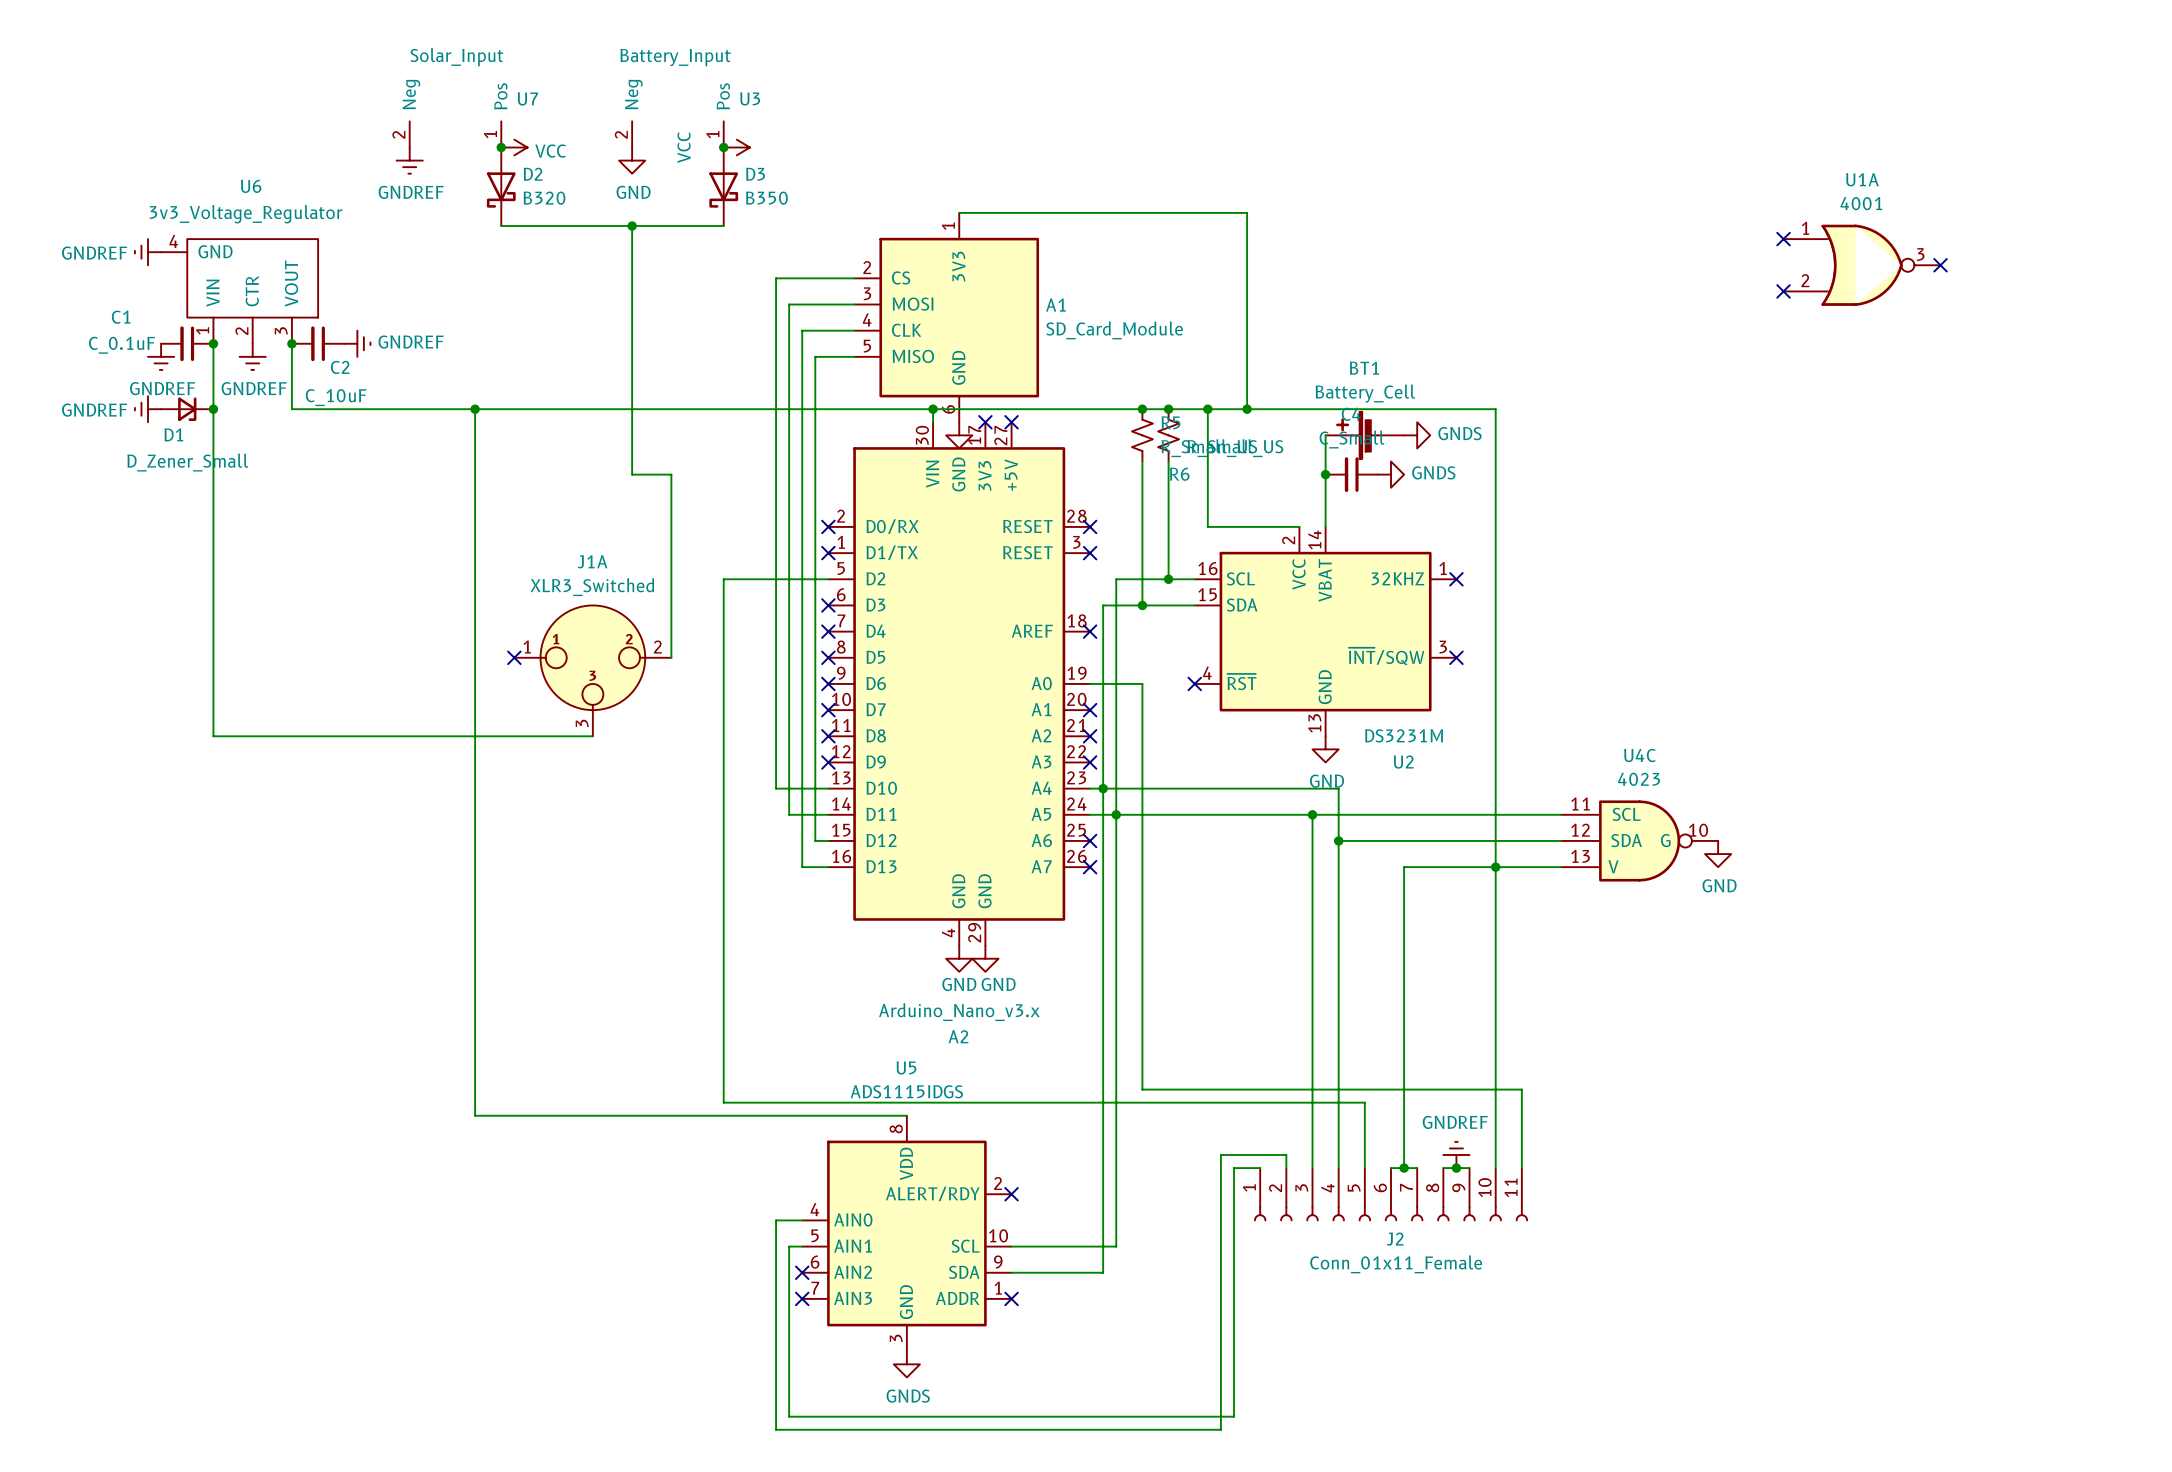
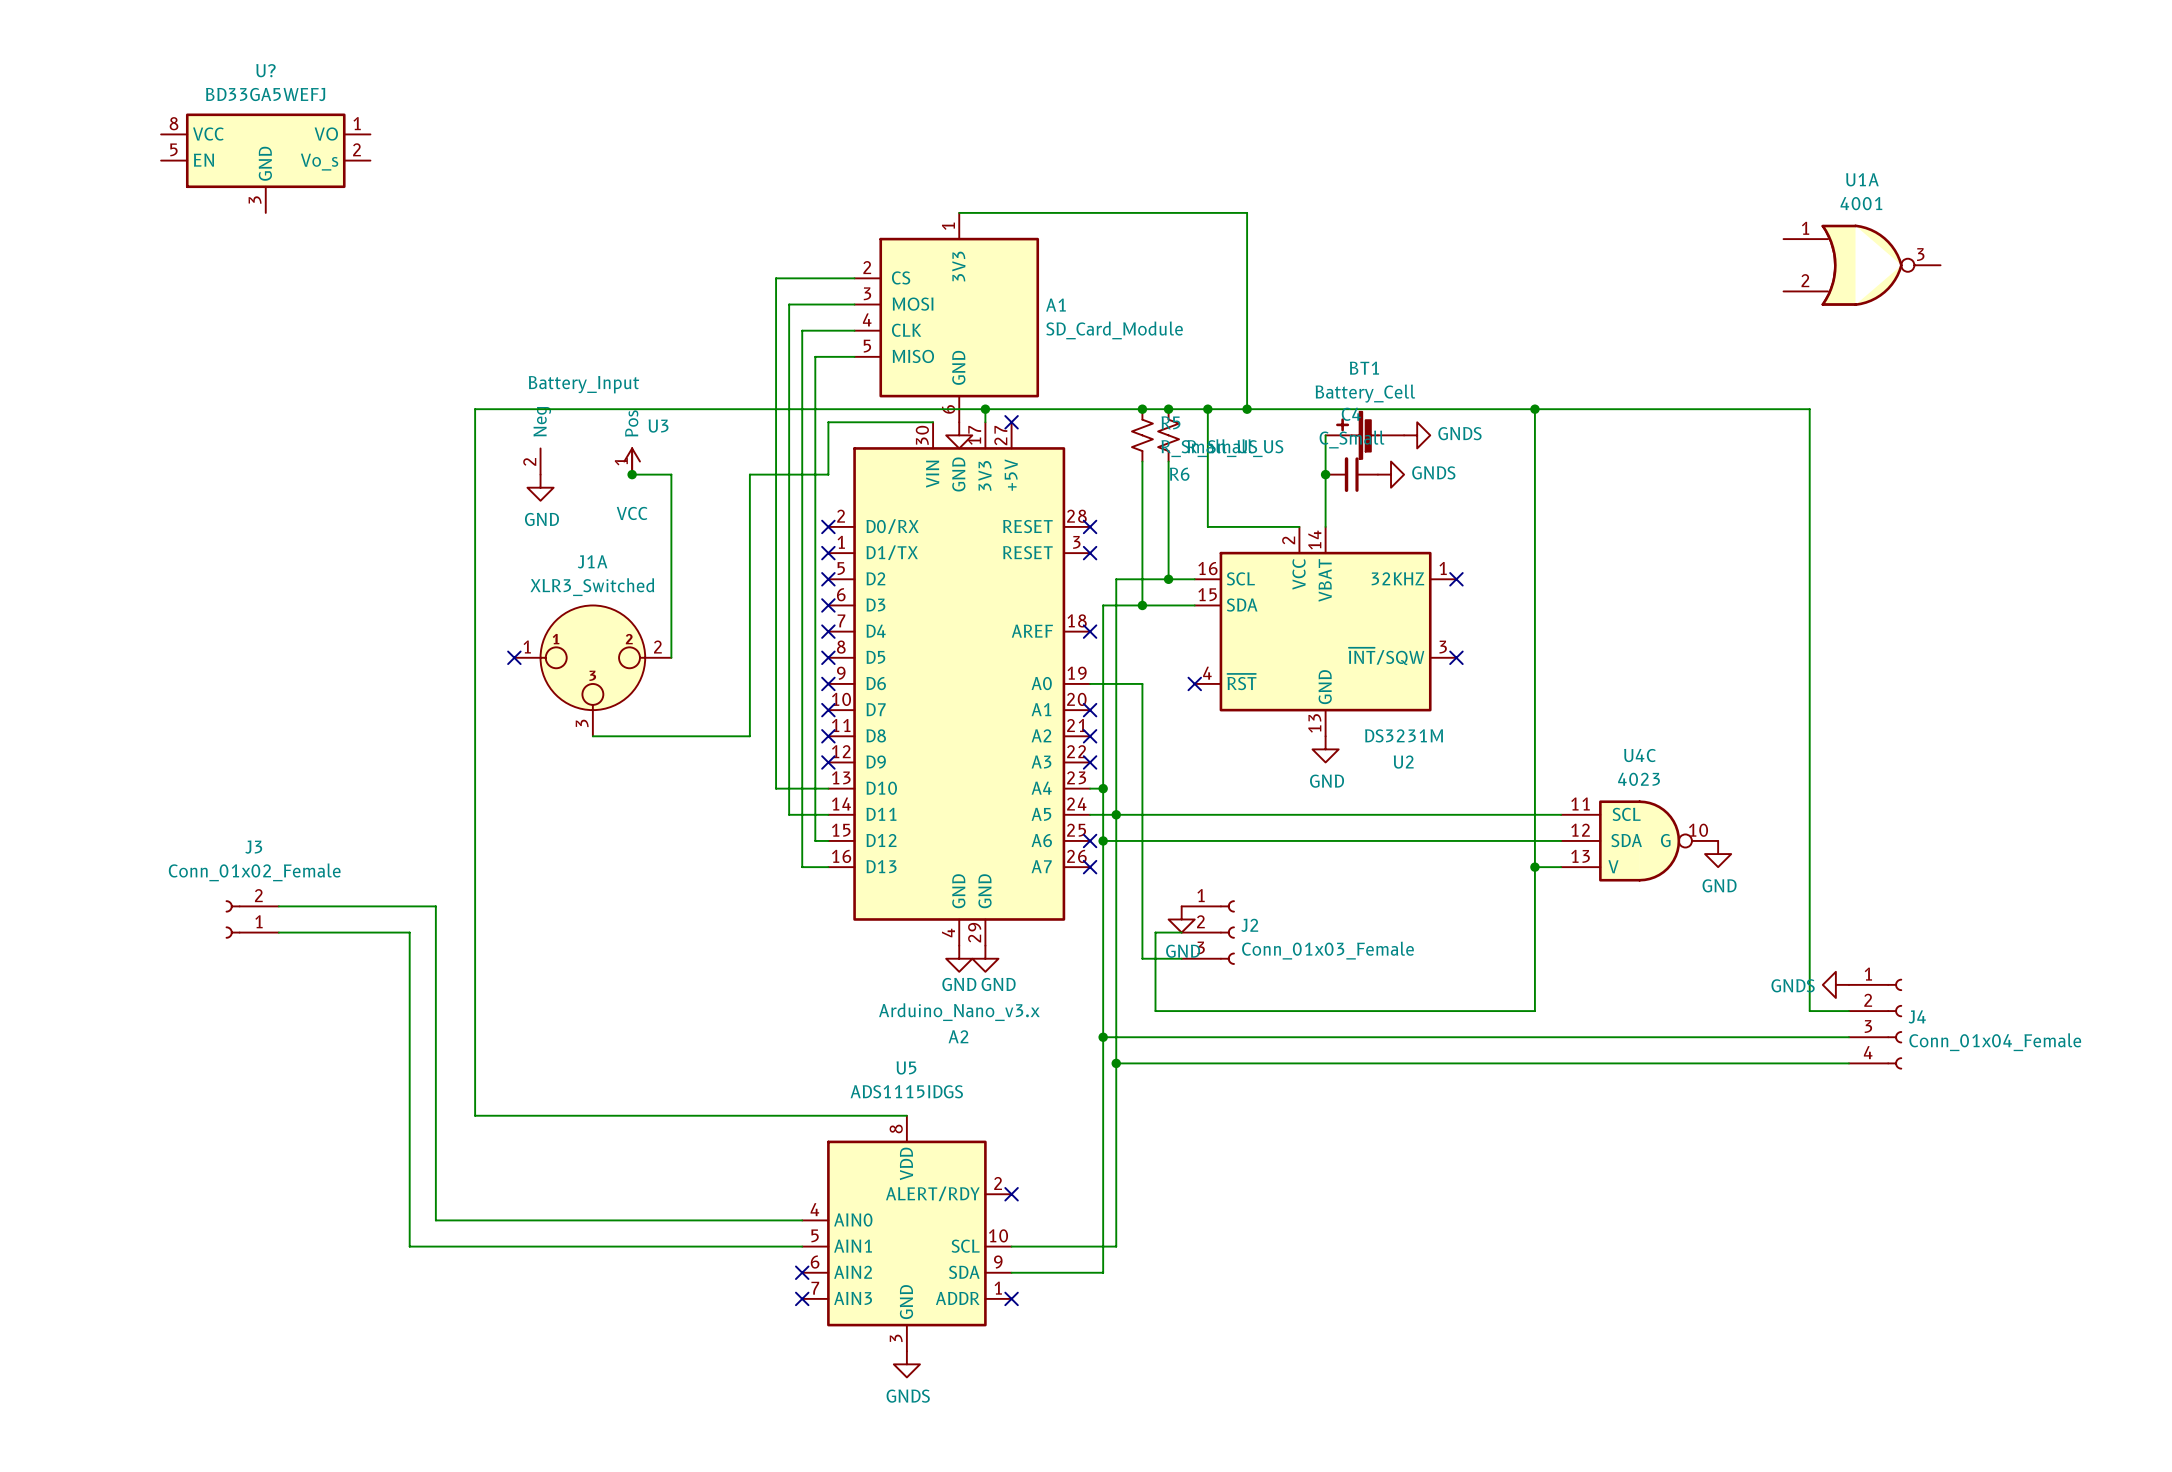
U7: Solar_Input (455, 134) -> none
U3 position: (677, 134) -> (586, 461)
junction: (501, 147) -> none
power symbol: VCC (514, 147) -> none
junction: (723, 147) -> none
power symbol: VCC (736, 147) -> none
power symbol: GNDREF (409, 160) -> none
power symbol: GND (632, 160) -> none
U?: none -> BD33GA5WEFJ (265, 163)
D2: B320 (501, 186) -> none
D3: B350 (723, 186) -> none
wire: (501, 226) (723, 226) -> none
wire: (632, 226) (632, 474) -> none
junction: (632, 226) -> none
no-connect mark: (1783, 239) -> none
power symbol: GNDREF (148, 252) -> none
no-connect mark: (1940, 265) -> none
U6: 3v3_Voltage_Regulator (239, 291) -> none
no-connect mark: (1783, 291) -> none
C1: C_0.1uF (187, 343) -> none
wire: (213, 343) (213, 736) (592, 736) -> none
junction: (213, 343) -> none
wire: (291, 343) (291, 409) (475, 409) -> none
junction: (291, 343) -> none
C2: C_10uF (318, 343) -> none
power symbol: GNDREF (357, 343) -> none
power symbol: GNDREF (161, 356) -> none
power symbol: GNDREF (252, 356) -> none
power symbol: GNDREF (148, 409) -> none
D1: D_Zener_Small (187, 409) -> none
junction: (213, 409) -> none
junction: (475, 409) -> none
wire: (933, 409) (933, 422) -> (592, 736) (749, 736) (749, 474) (828, 474) (828, 422) (933, 422)
junction position: (933, 409) -> (985, 409)
wire: none -> (985, 409) (985, 422)
wire: (1495, 409) (1495, 1168) -> (1495, 409) (1809, 409) (1809, 1011) (1848, 1011)
wire: none -> (1534, 409) (1534, 1011) (1155, 1011) (1155, 932) (1181, 932)
junction: none -> (1534, 409)
no-connect mark: (985, 422) -> none
power symbol: none -> VCC (632, 461)
junction: none -> (632, 474)
power symbol: none -> GND (540, 487)
wire: (828, 579) (723, 579) (723, 1102) (1364, 1102) (1364, 1168) -> none
no-connect mark: none -> (828, 579)
wire: (1103, 788) (1338, 788) (1338, 1168) -> none
wire: (1312, 814) (1312, 1168) -> none
junction: (1312, 814) -> none
wire: none -> (1103, 840) (1338, 840)
junction: none -> (1103, 840)
junction: (1338, 840) -> none
junction position: (1495, 867) -> (1534, 867)
wire: (1534, 867) (1404, 867) (1404, 1168) -> none
J3: none -> Conn_01x02_Female (252, 919)
power symbol: none -> GND (1181, 919)
wire: (1142, 958) (1142, 1089) (1521, 1089) (1521, 1168) -> (1142, 958) (1181, 958)
power symbol: none -> GNDS (1835, 984)
J4: none -> Conn_01x04_Female (1875, 1024)
wire: none -> (1103, 1037) (1848, 1037)
junction: none -> (1103, 1037)
wire: none -> (1116, 1063) (1848, 1063)
junction: none -> (1116, 1063)
power symbol: GNDREF (1456, 1154) -> none
J2 symbol: [1254, 1168, 1528, 1222] -> [1181, 900, 1235, 965]
wire: (1260, 1168) (1234, 1168) (1234, 1416) (789, 1416) (789, 1246) -> (278, 932) (409, 932) (409, 1246) (789, 1246)
wire: (1286, 1168) (1286, 1154) (1220, 1154) (1220, 1429) (776, 1429) (776, 1220) -> (278, 906) (435, 906) (435, 1220) (776, 1220)
wire: (1391, 1168) (1417, 1168) -> none
junction: (1404, 1168) -> none
wire: (1443, 1168) (1469, 1168) -> none
junction: (1456, 1168) -> none
J2 name position: J2 (1395, 1239) -> J2 (1249, 925)
J2 value: Conn_01x11_Female (1396, 1264) -> Conn_01x03_Female (1327, 950)

